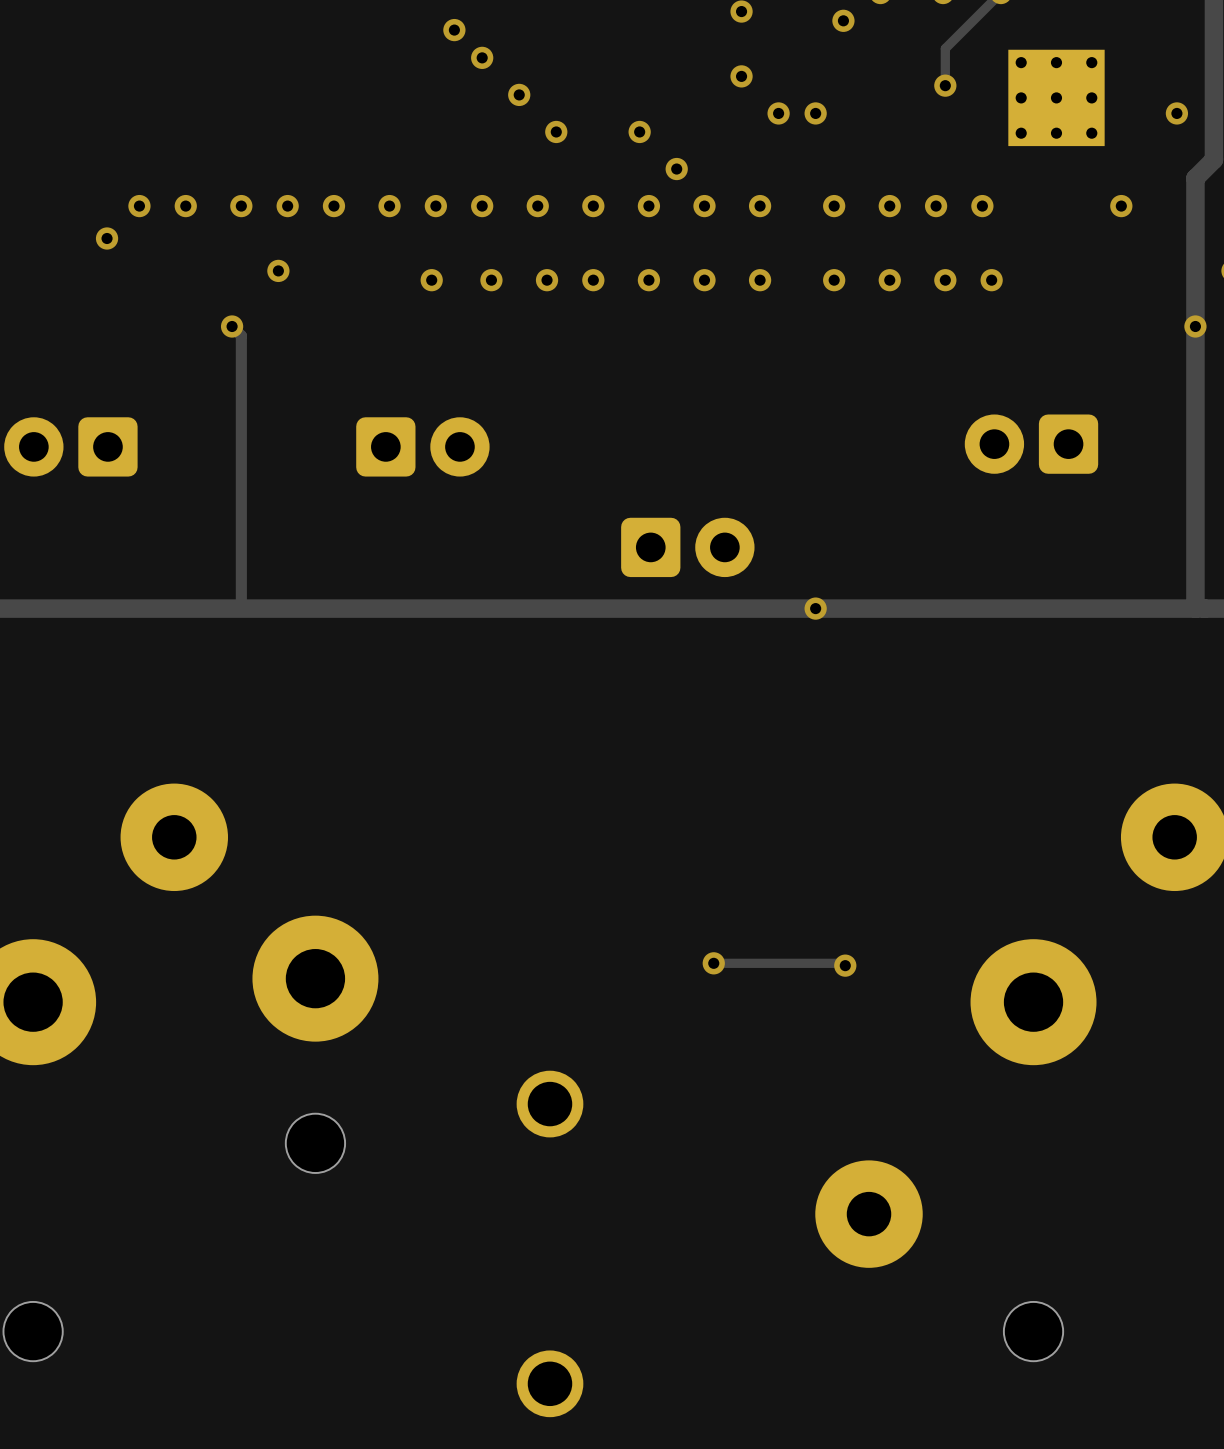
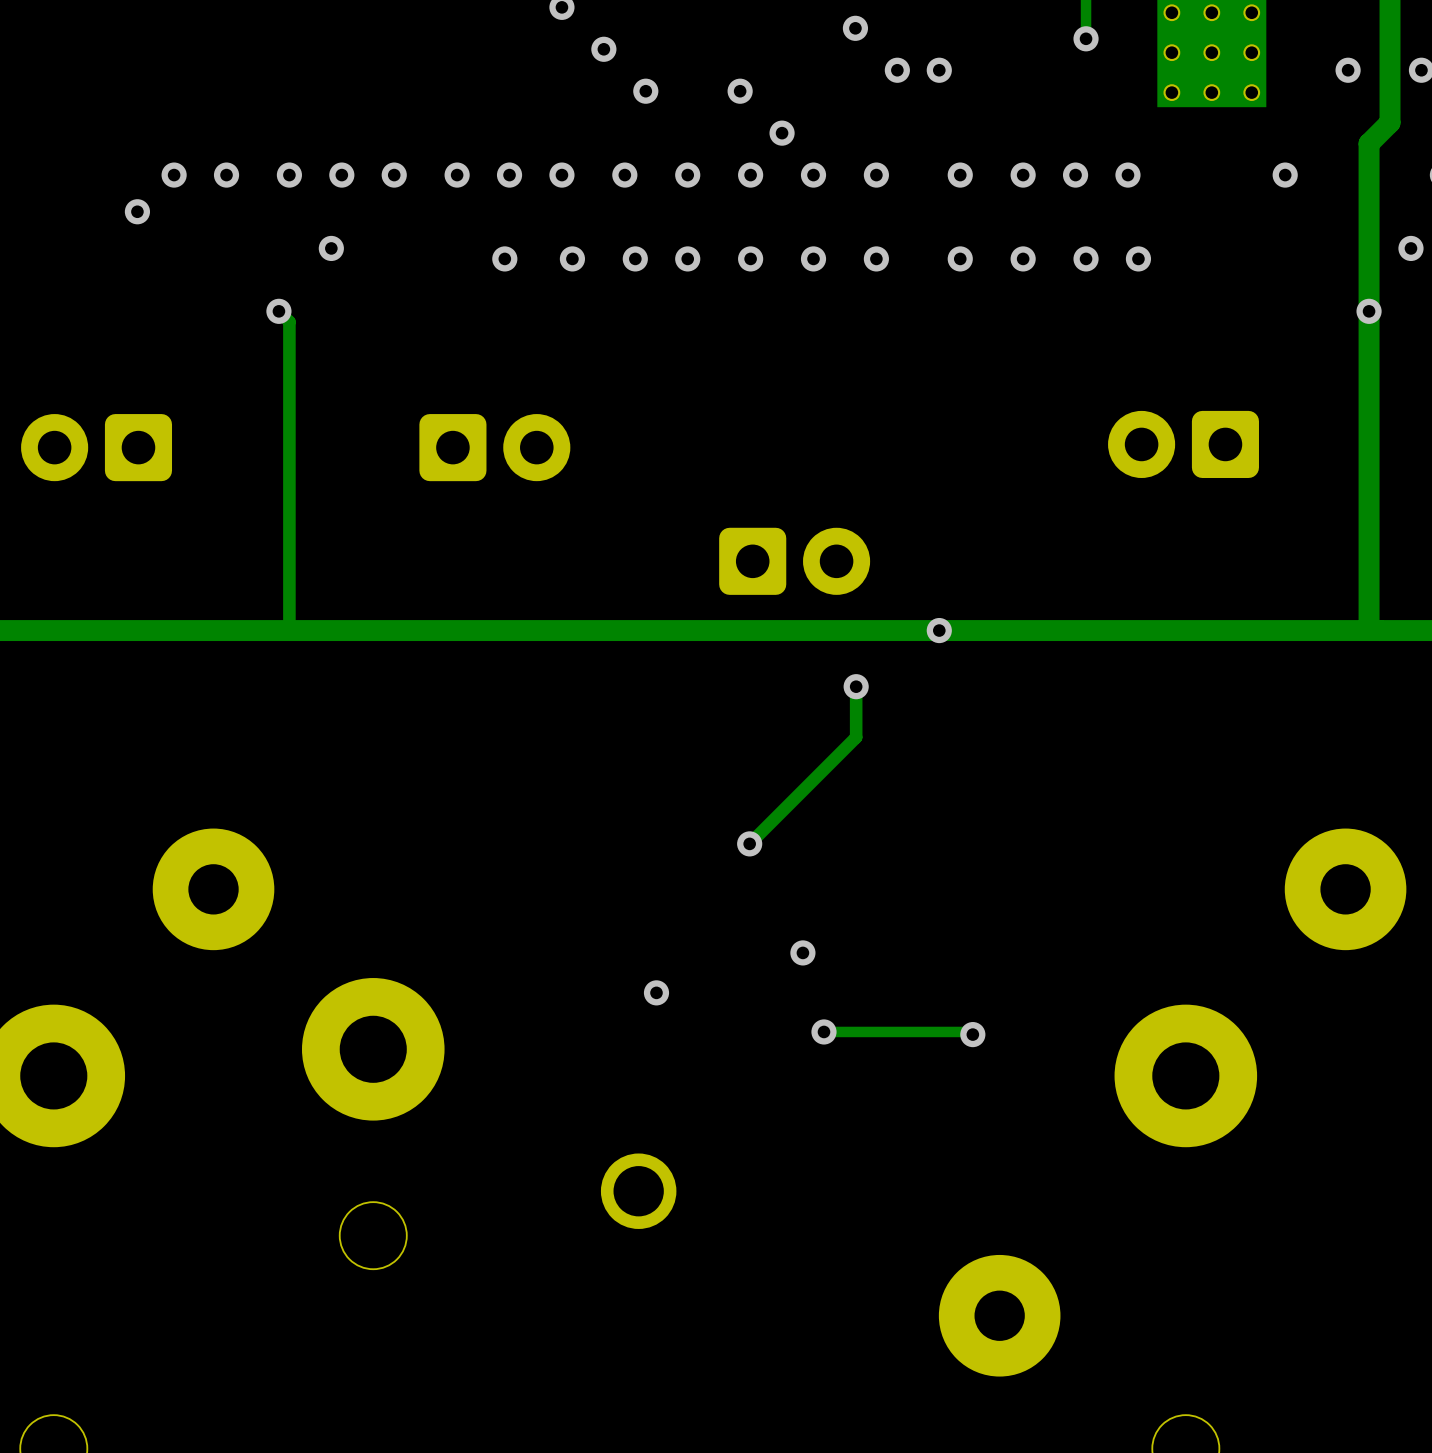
track: none -> (856, 686) (856, 737) (749, 843)
via: none -> (856, 686)
via: none -> (749, 843)
via: none -> (802, 952)
via: none -> (656, 992)

